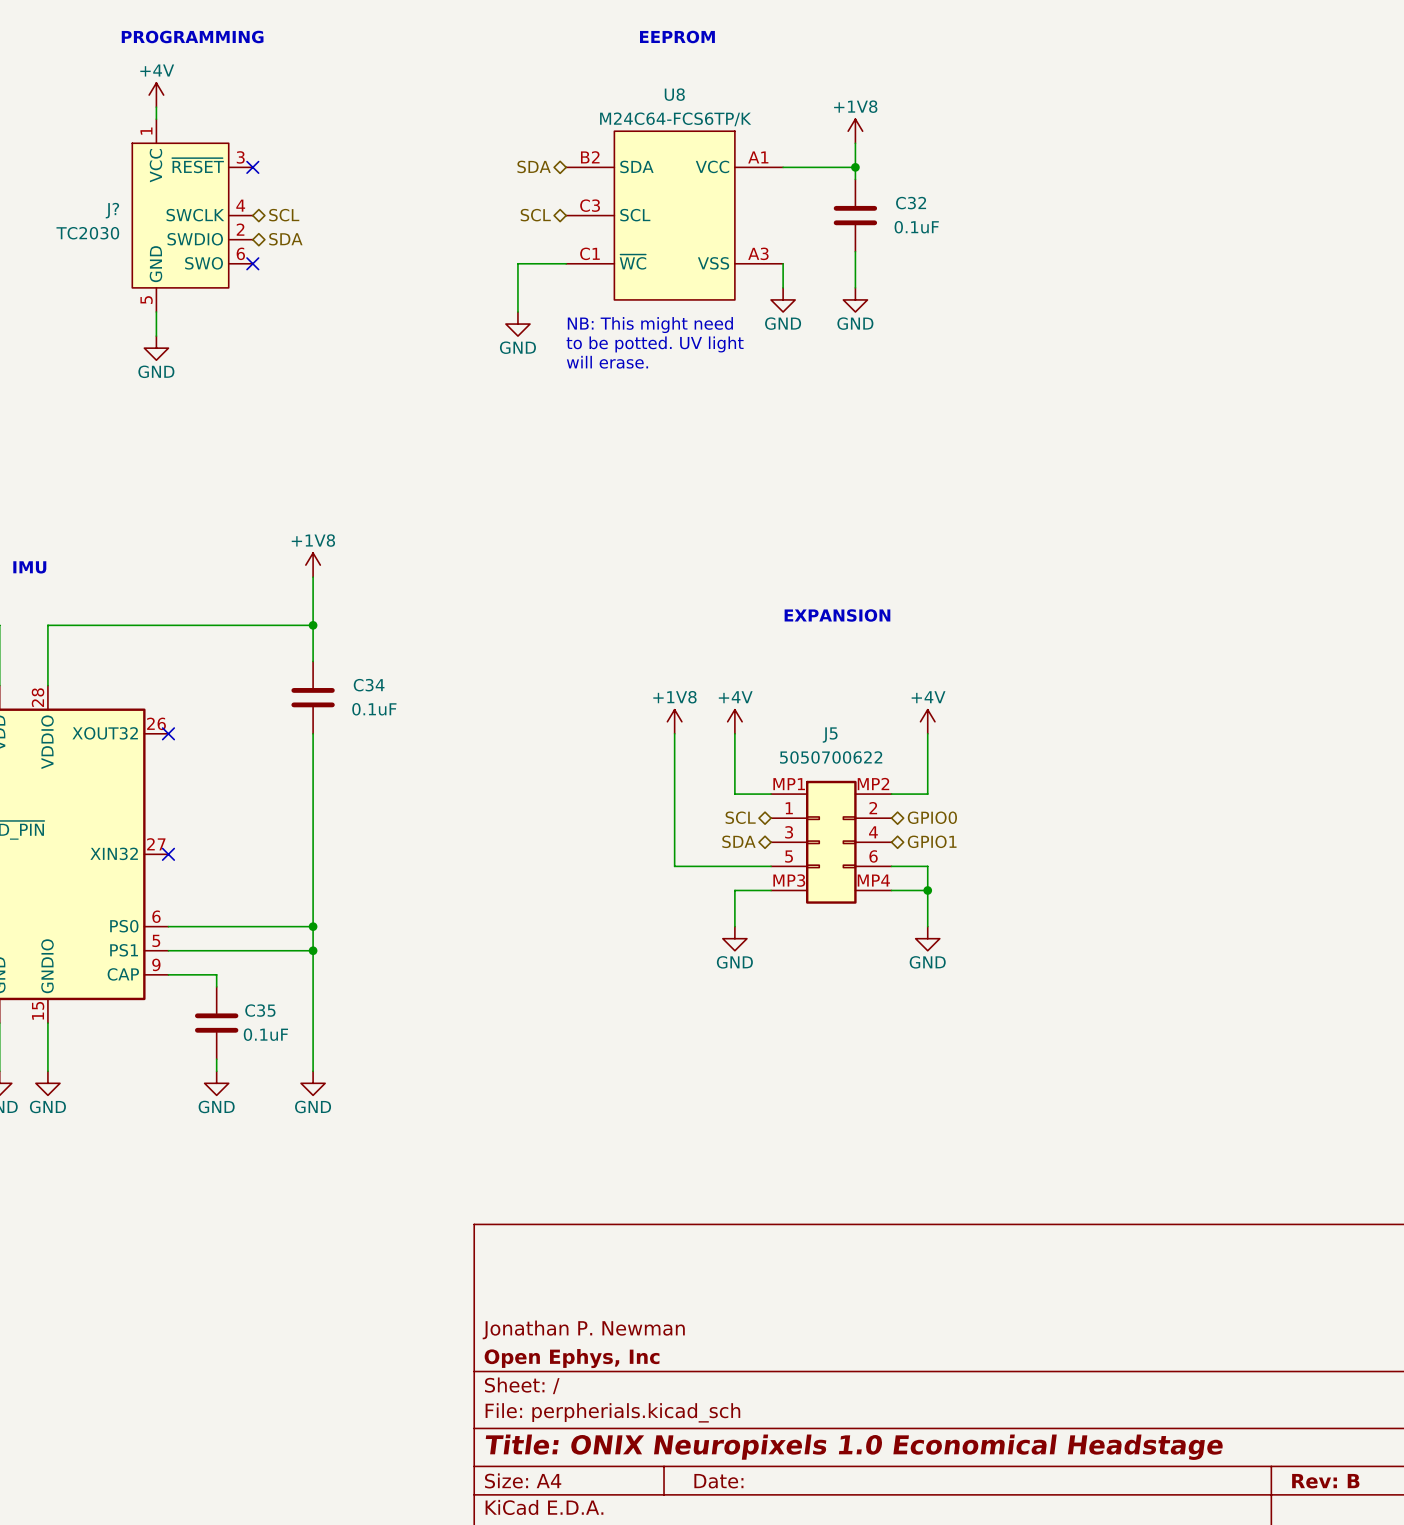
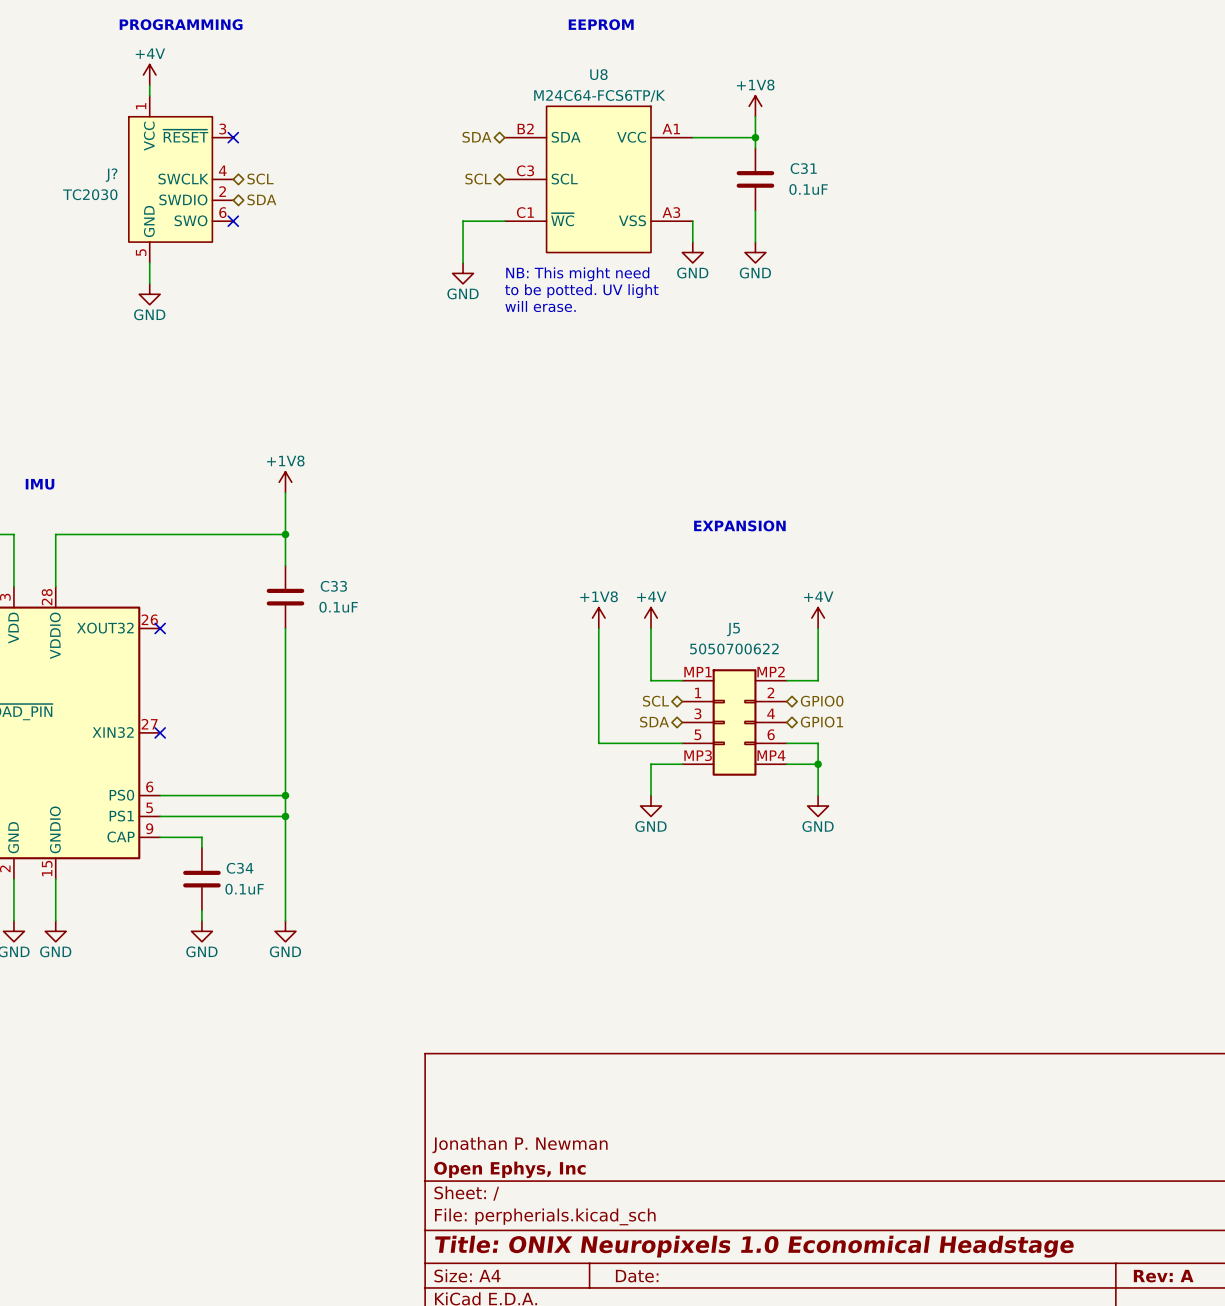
C32 name: C32 (911, 203) -> C31 (803, 168)
C34 name: C34 (369, 685) -> C33 (333, 586)
C35 name: C35 (260, 1010) -> C34 (240, 868)
title block: Rev: B (1325, 1481) -> Rev: A (1163, 1276)

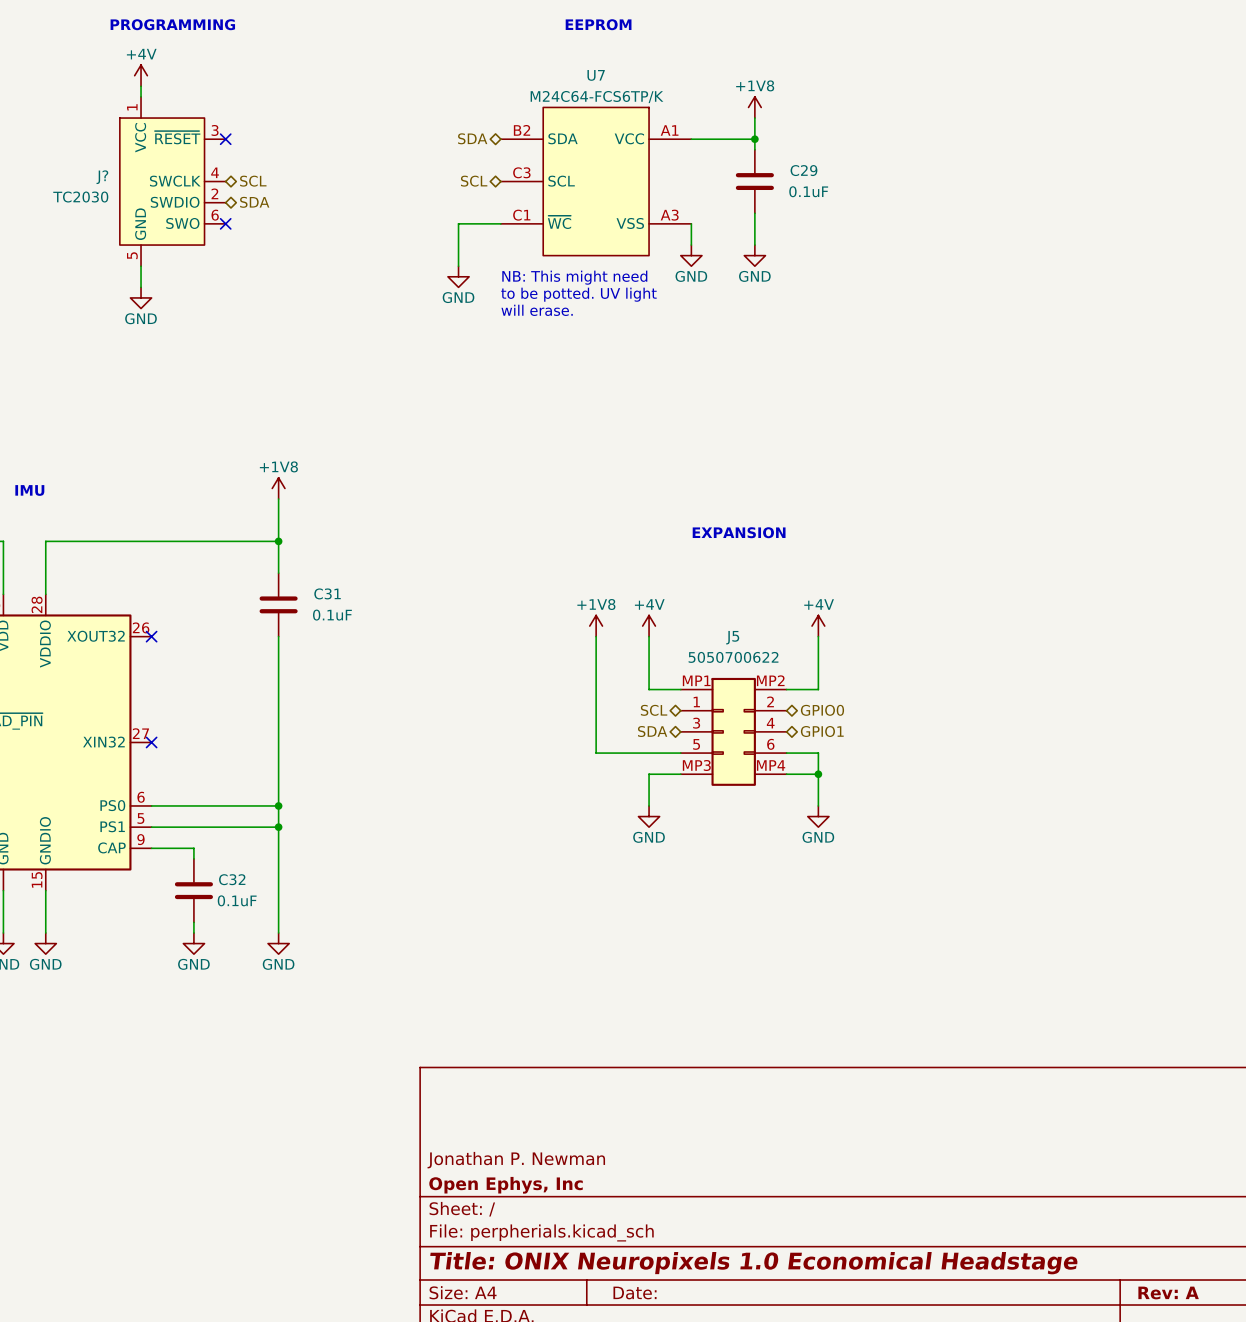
U8 name: U8 (598, 74) -> U7 (596, 75)
C31 name: C31 (803, 168) -> C29 (803, 170)
C33 name: C33 (333, 586) -> C31 (327, 593)
C34 name: C34 (240, 868) -> C32 (232, 879)

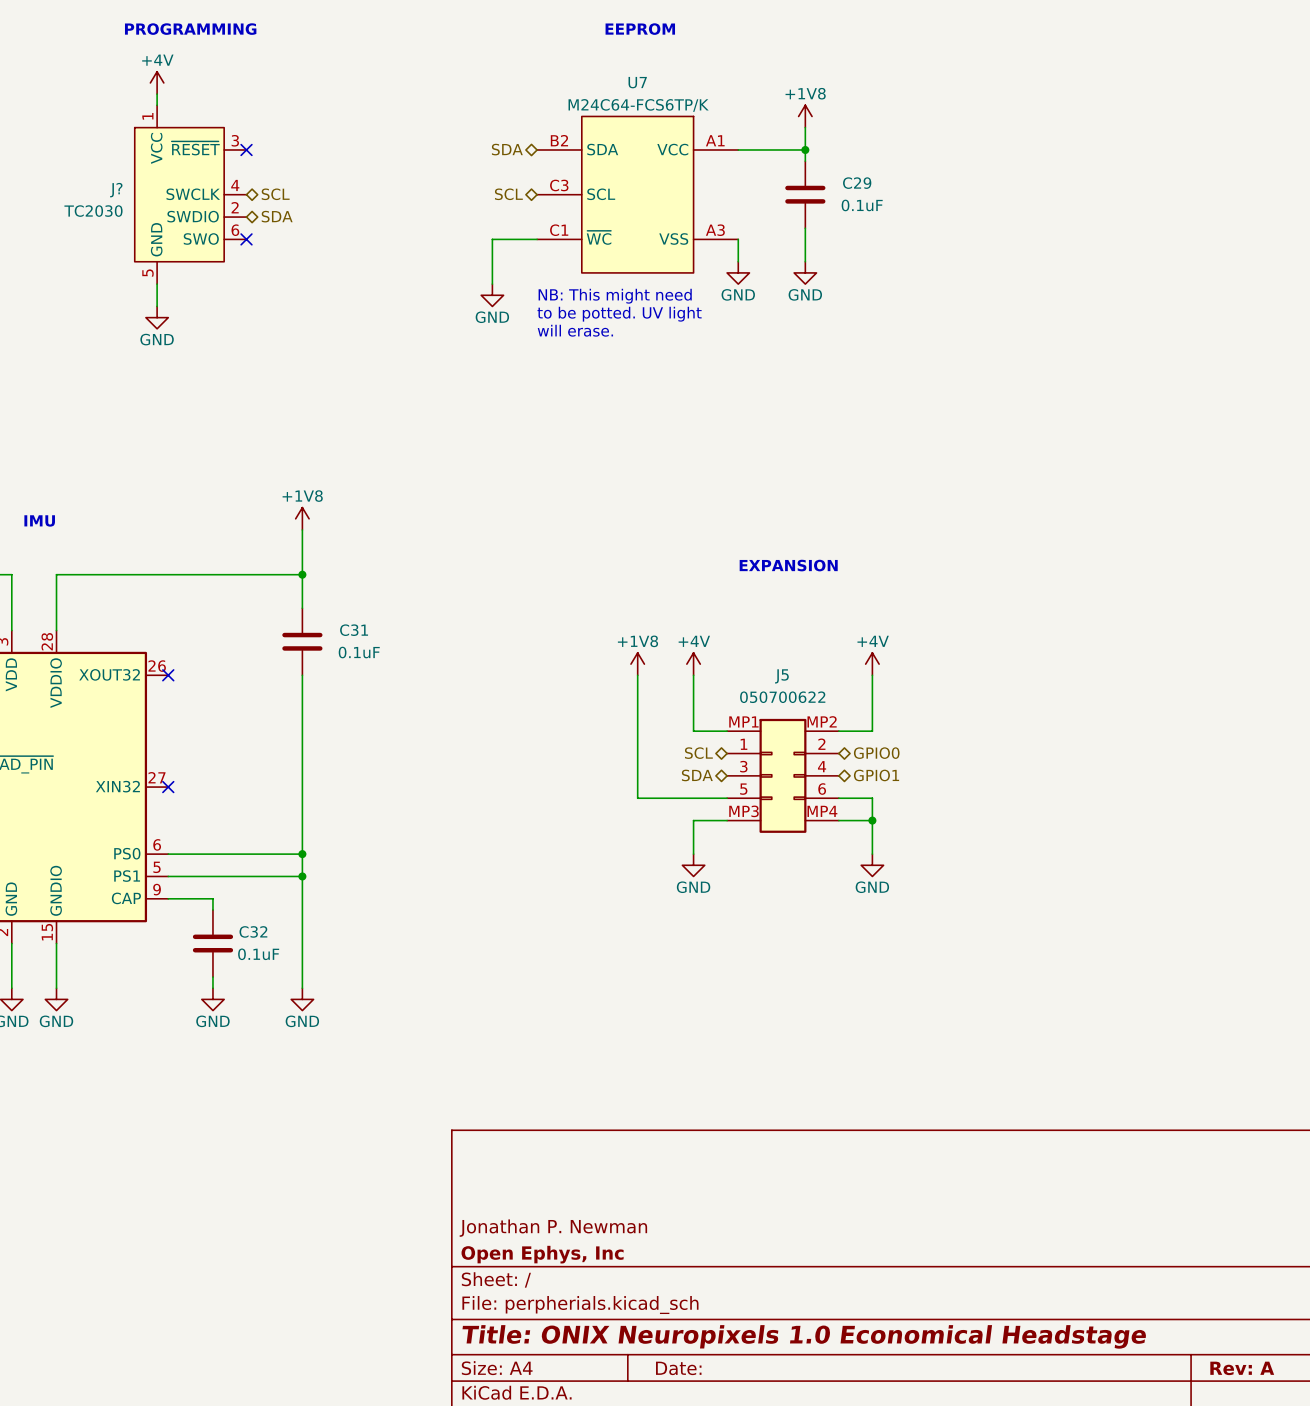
J5 value: 5050700622 (733, 657) -> 050700622 (782, 697)

